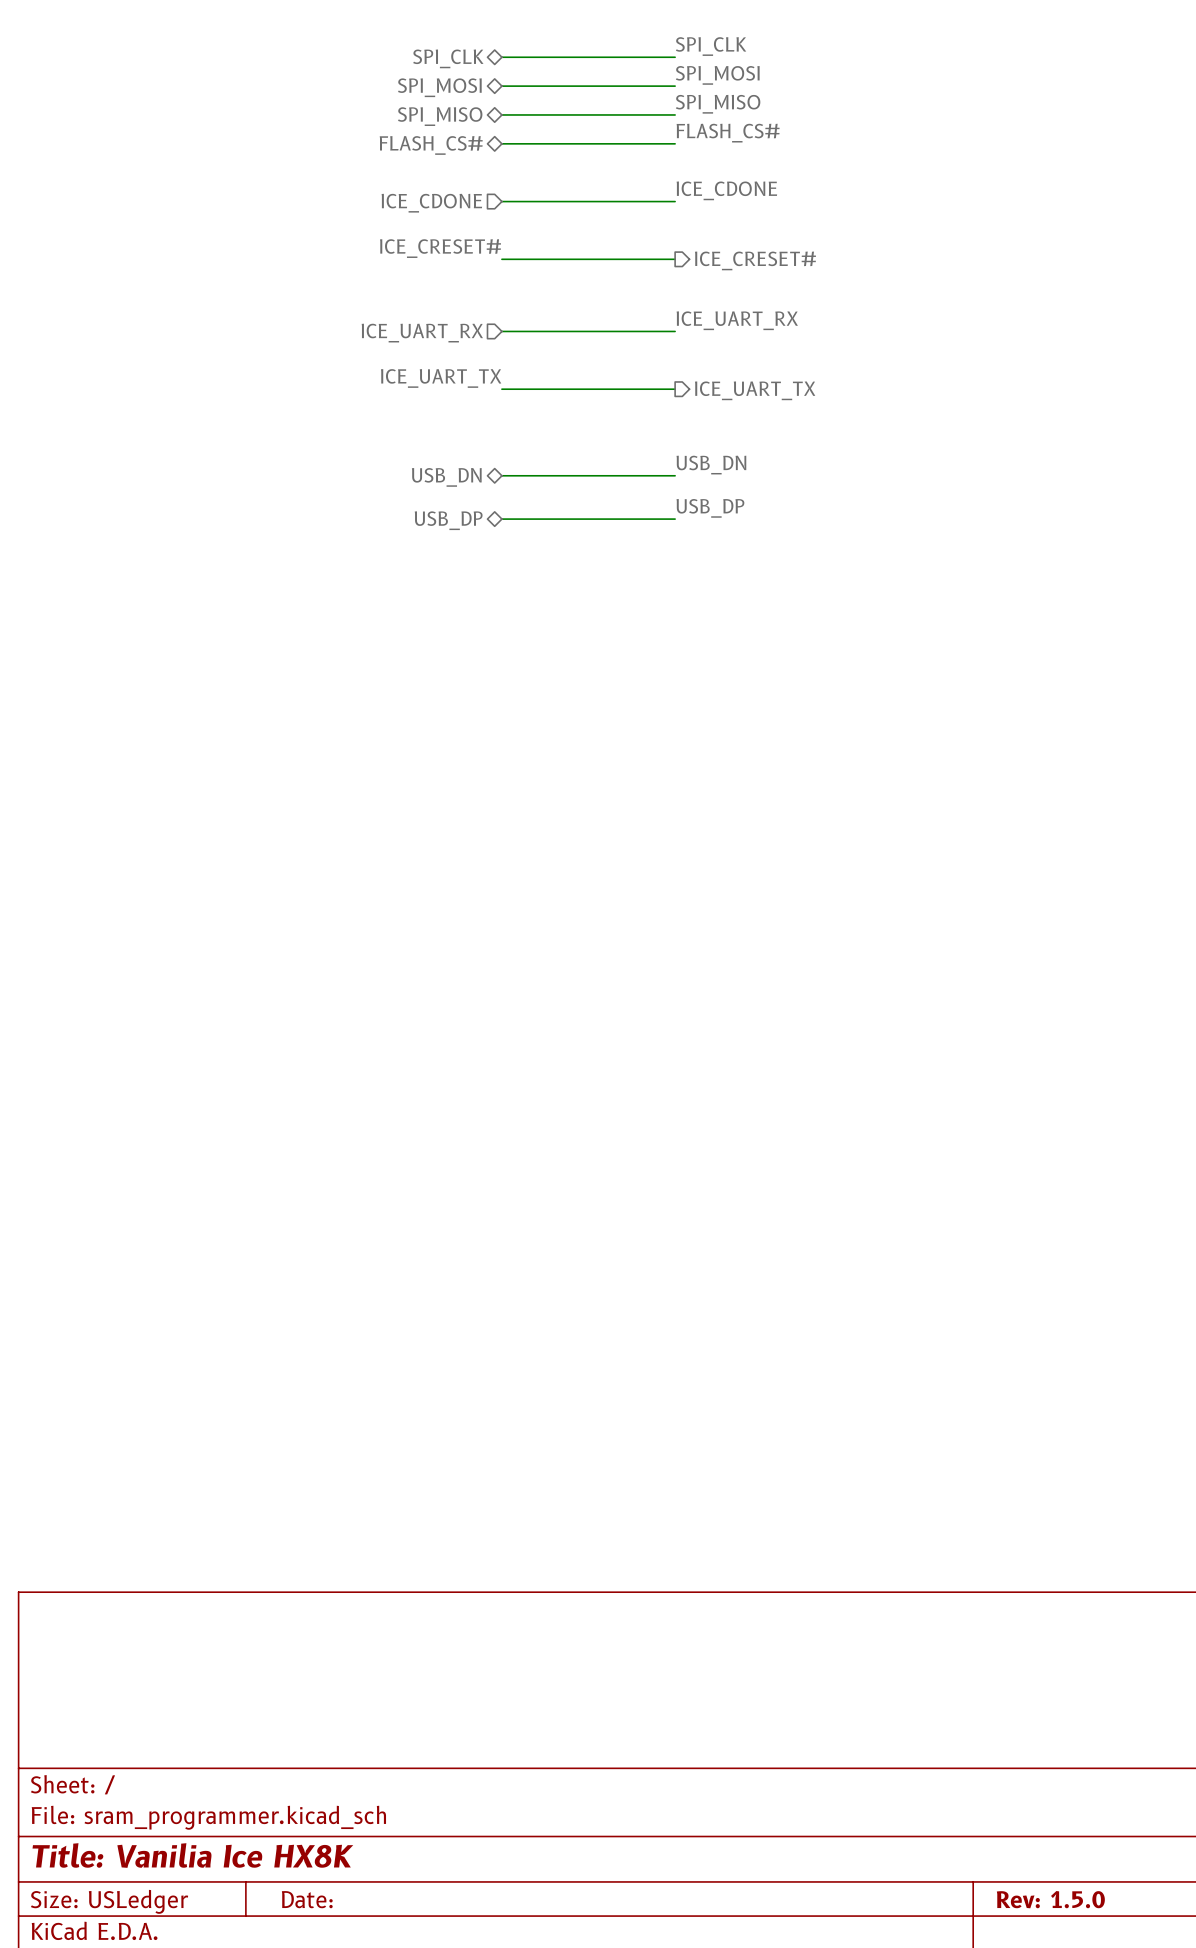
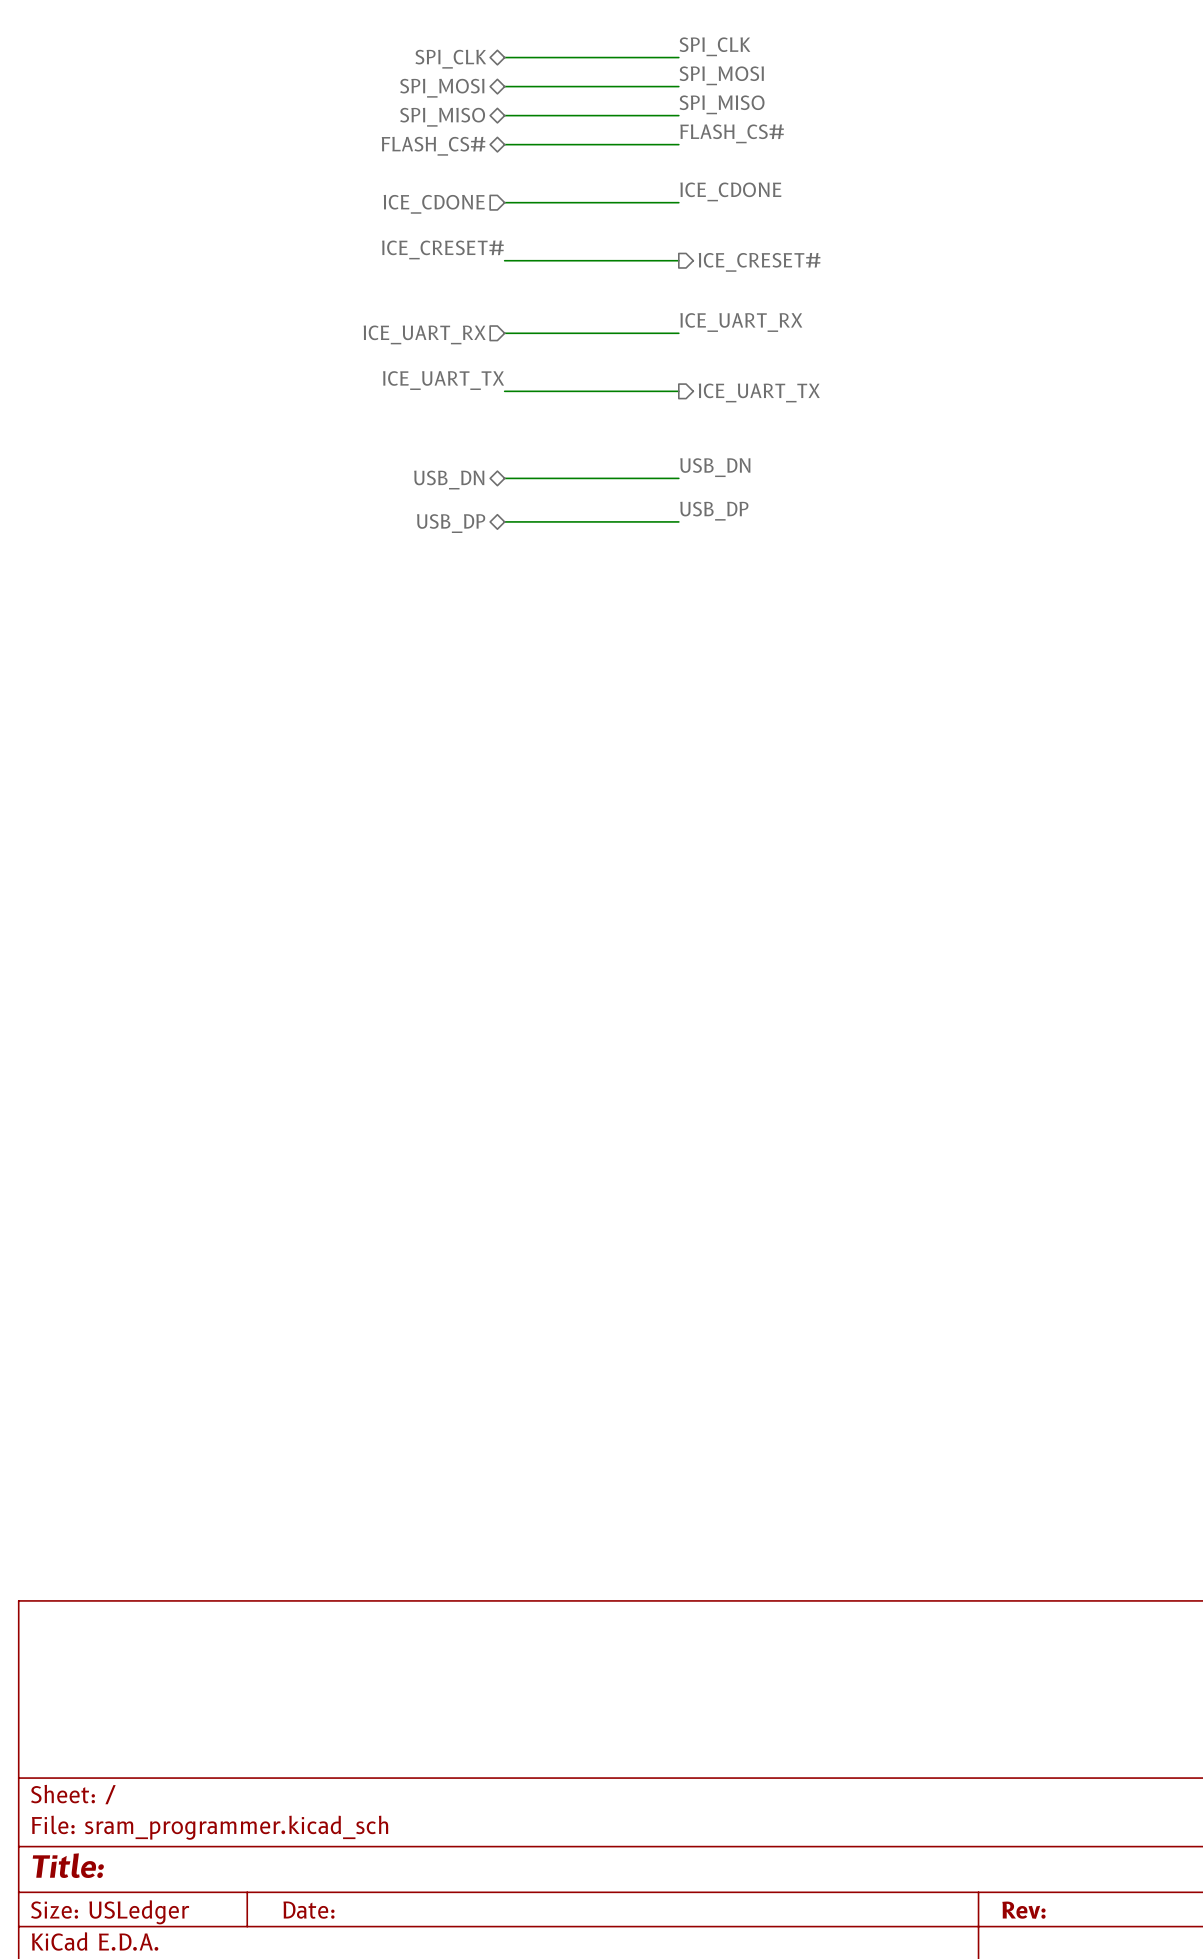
title block: Title: Vanilia Ice HX8K (192, 1855) -> Title: (68, 1865)
title block: Rev: 1.5.0 (1050, 1899) -> Rev: (1023, 1910)

